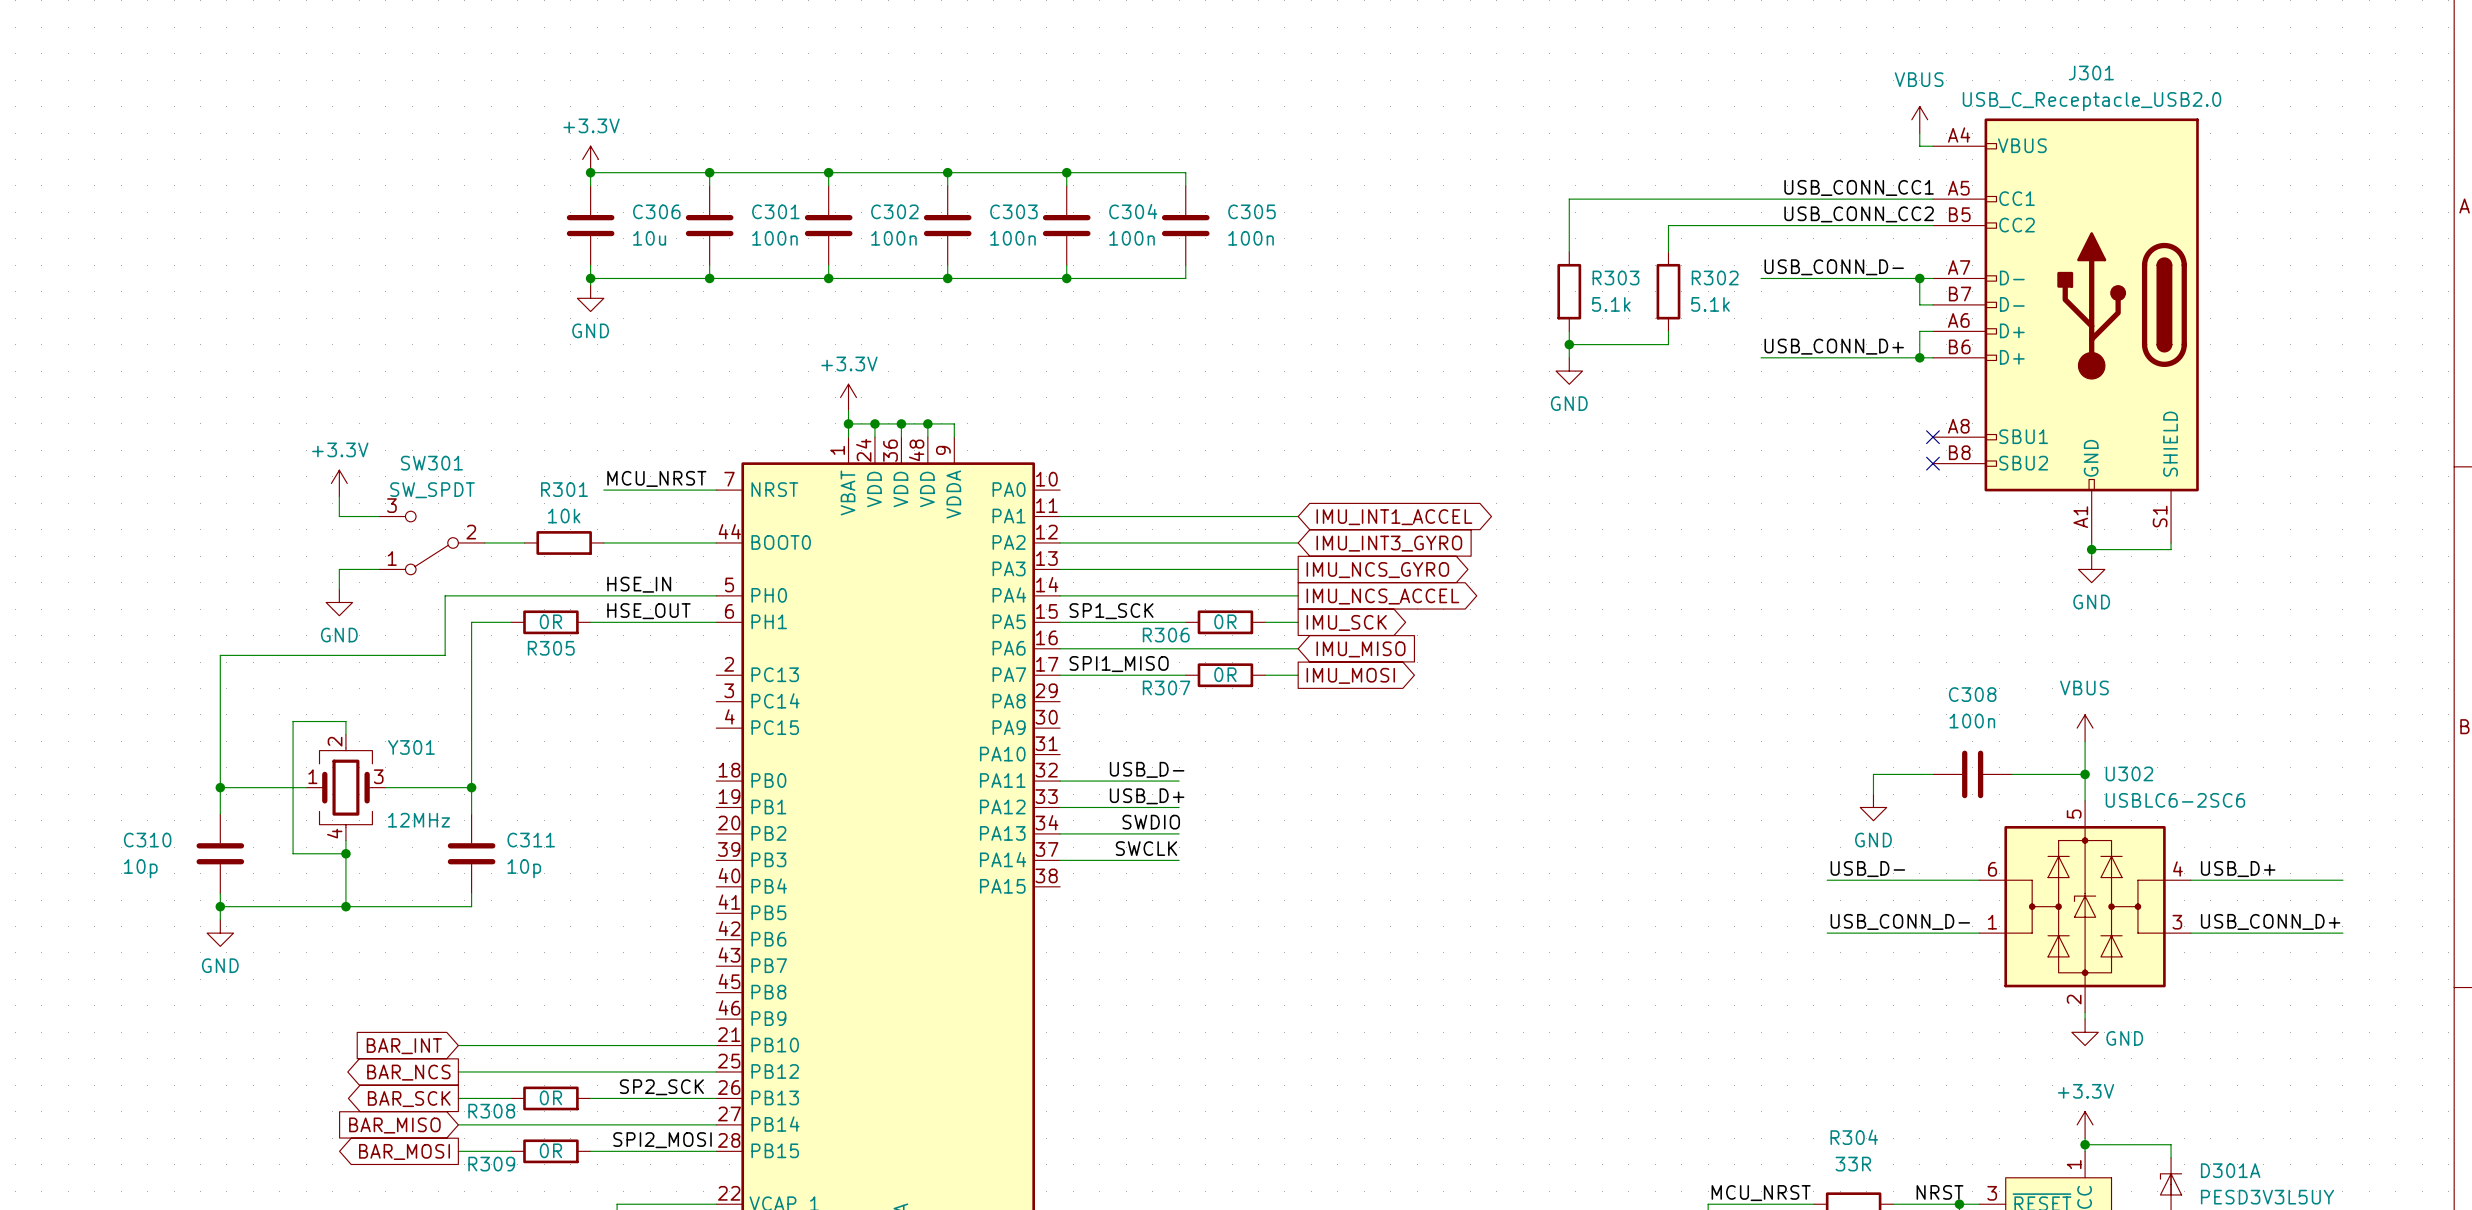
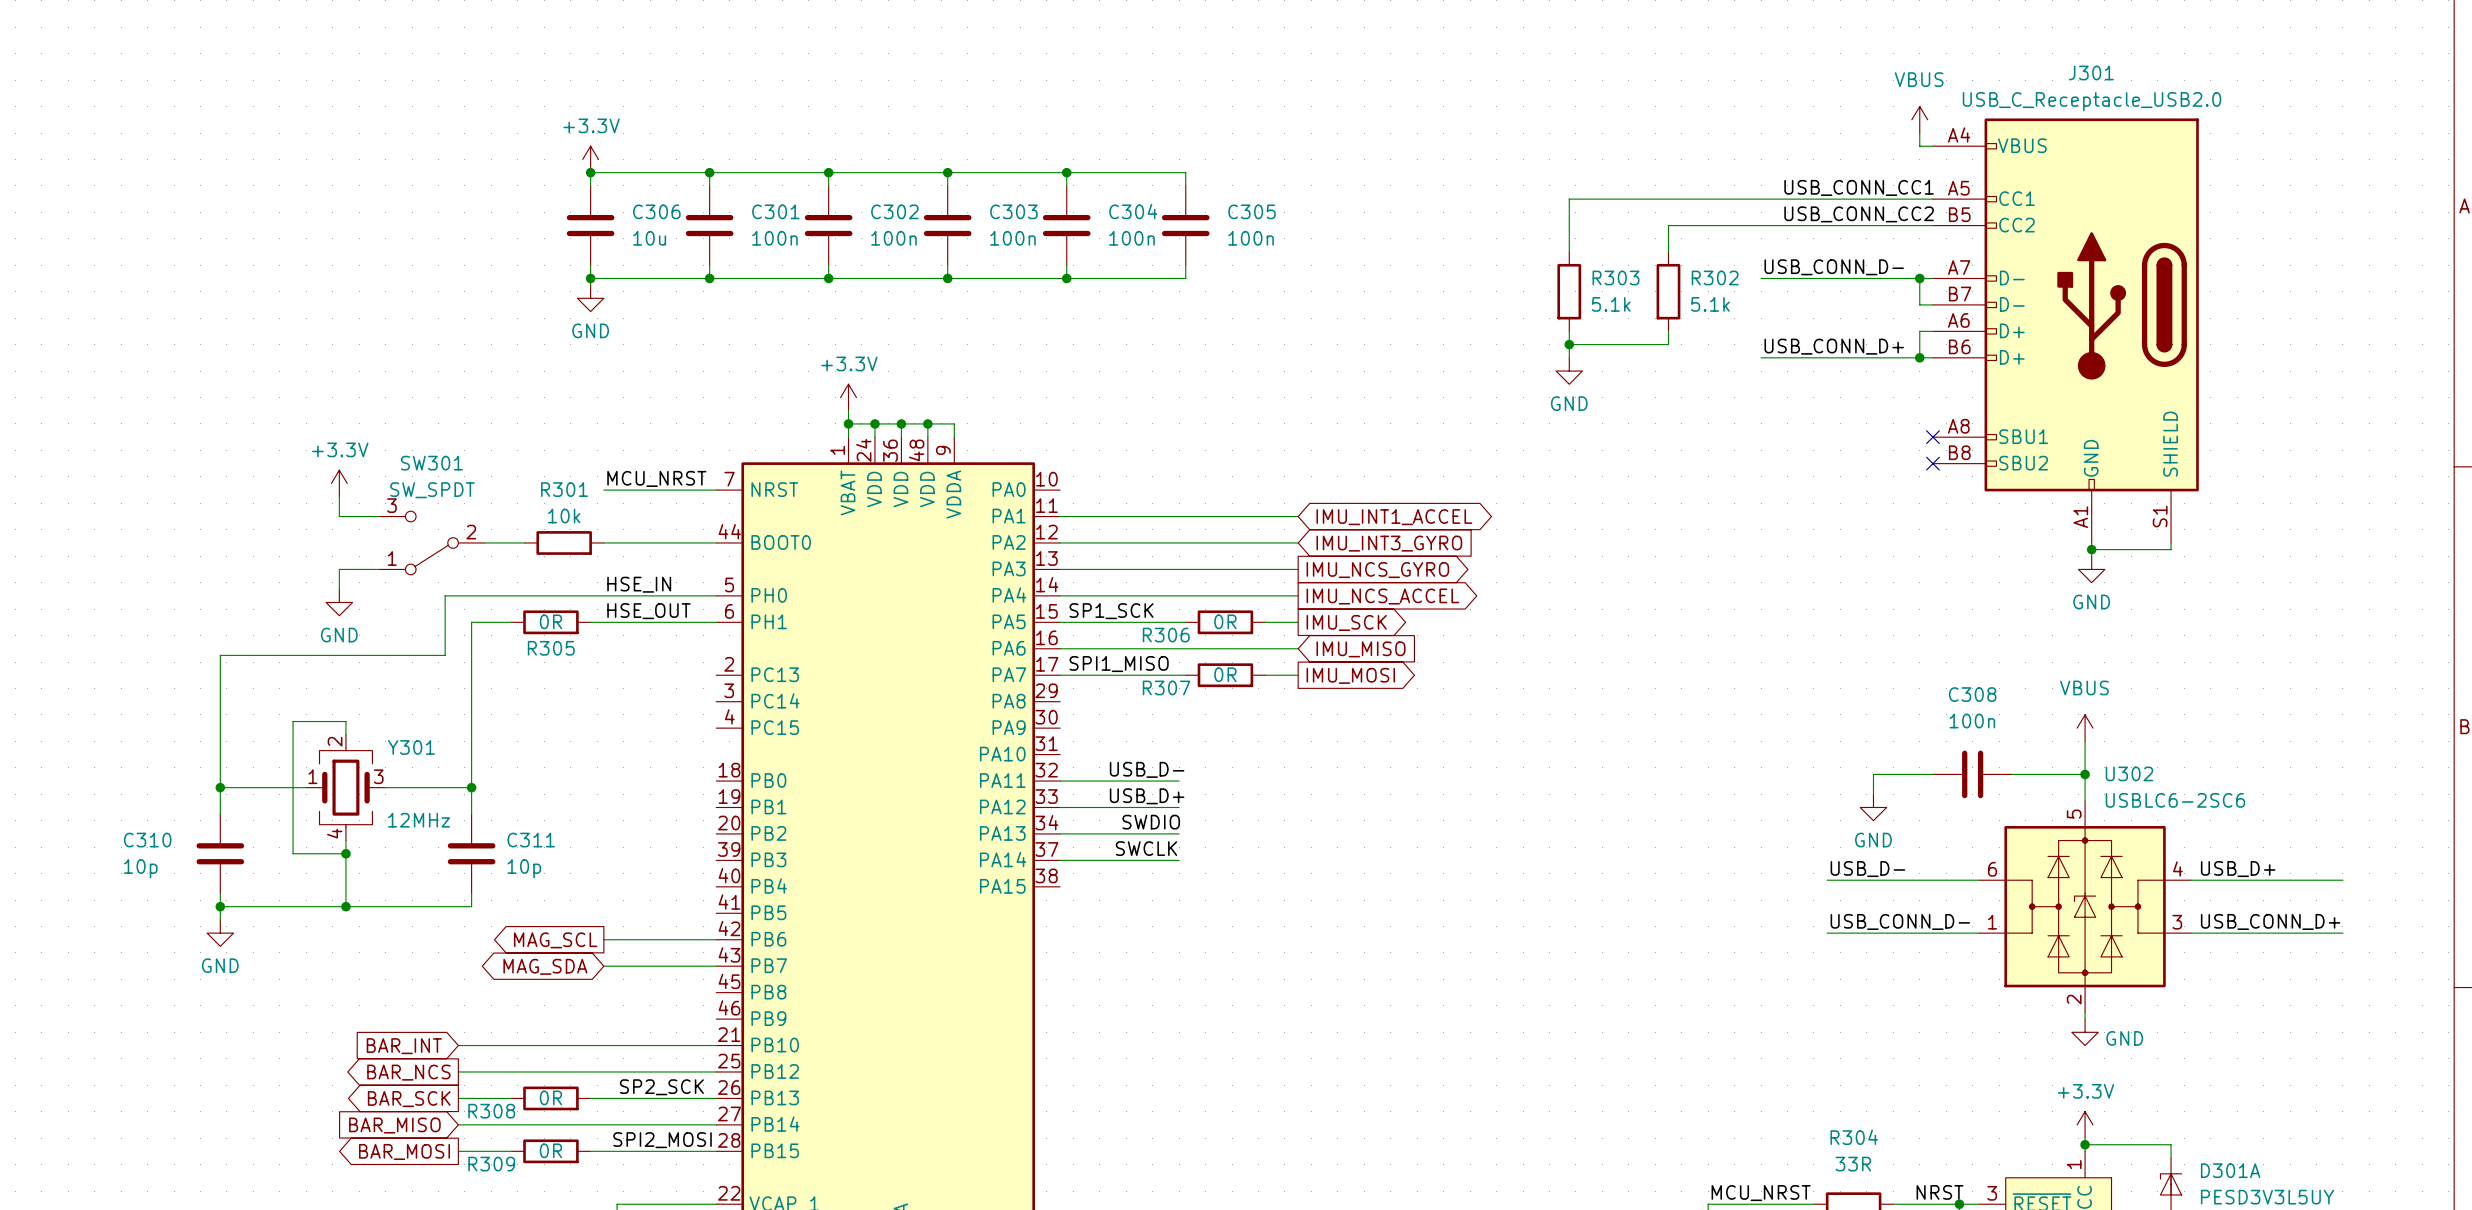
wire: none -> (603, 939) (716, 939)
global label: none -> MAG_SCL (555, 940)
global label: none -> MAG_SDA (545, 966)
wire: none -> (603, 966) (716, 966)

